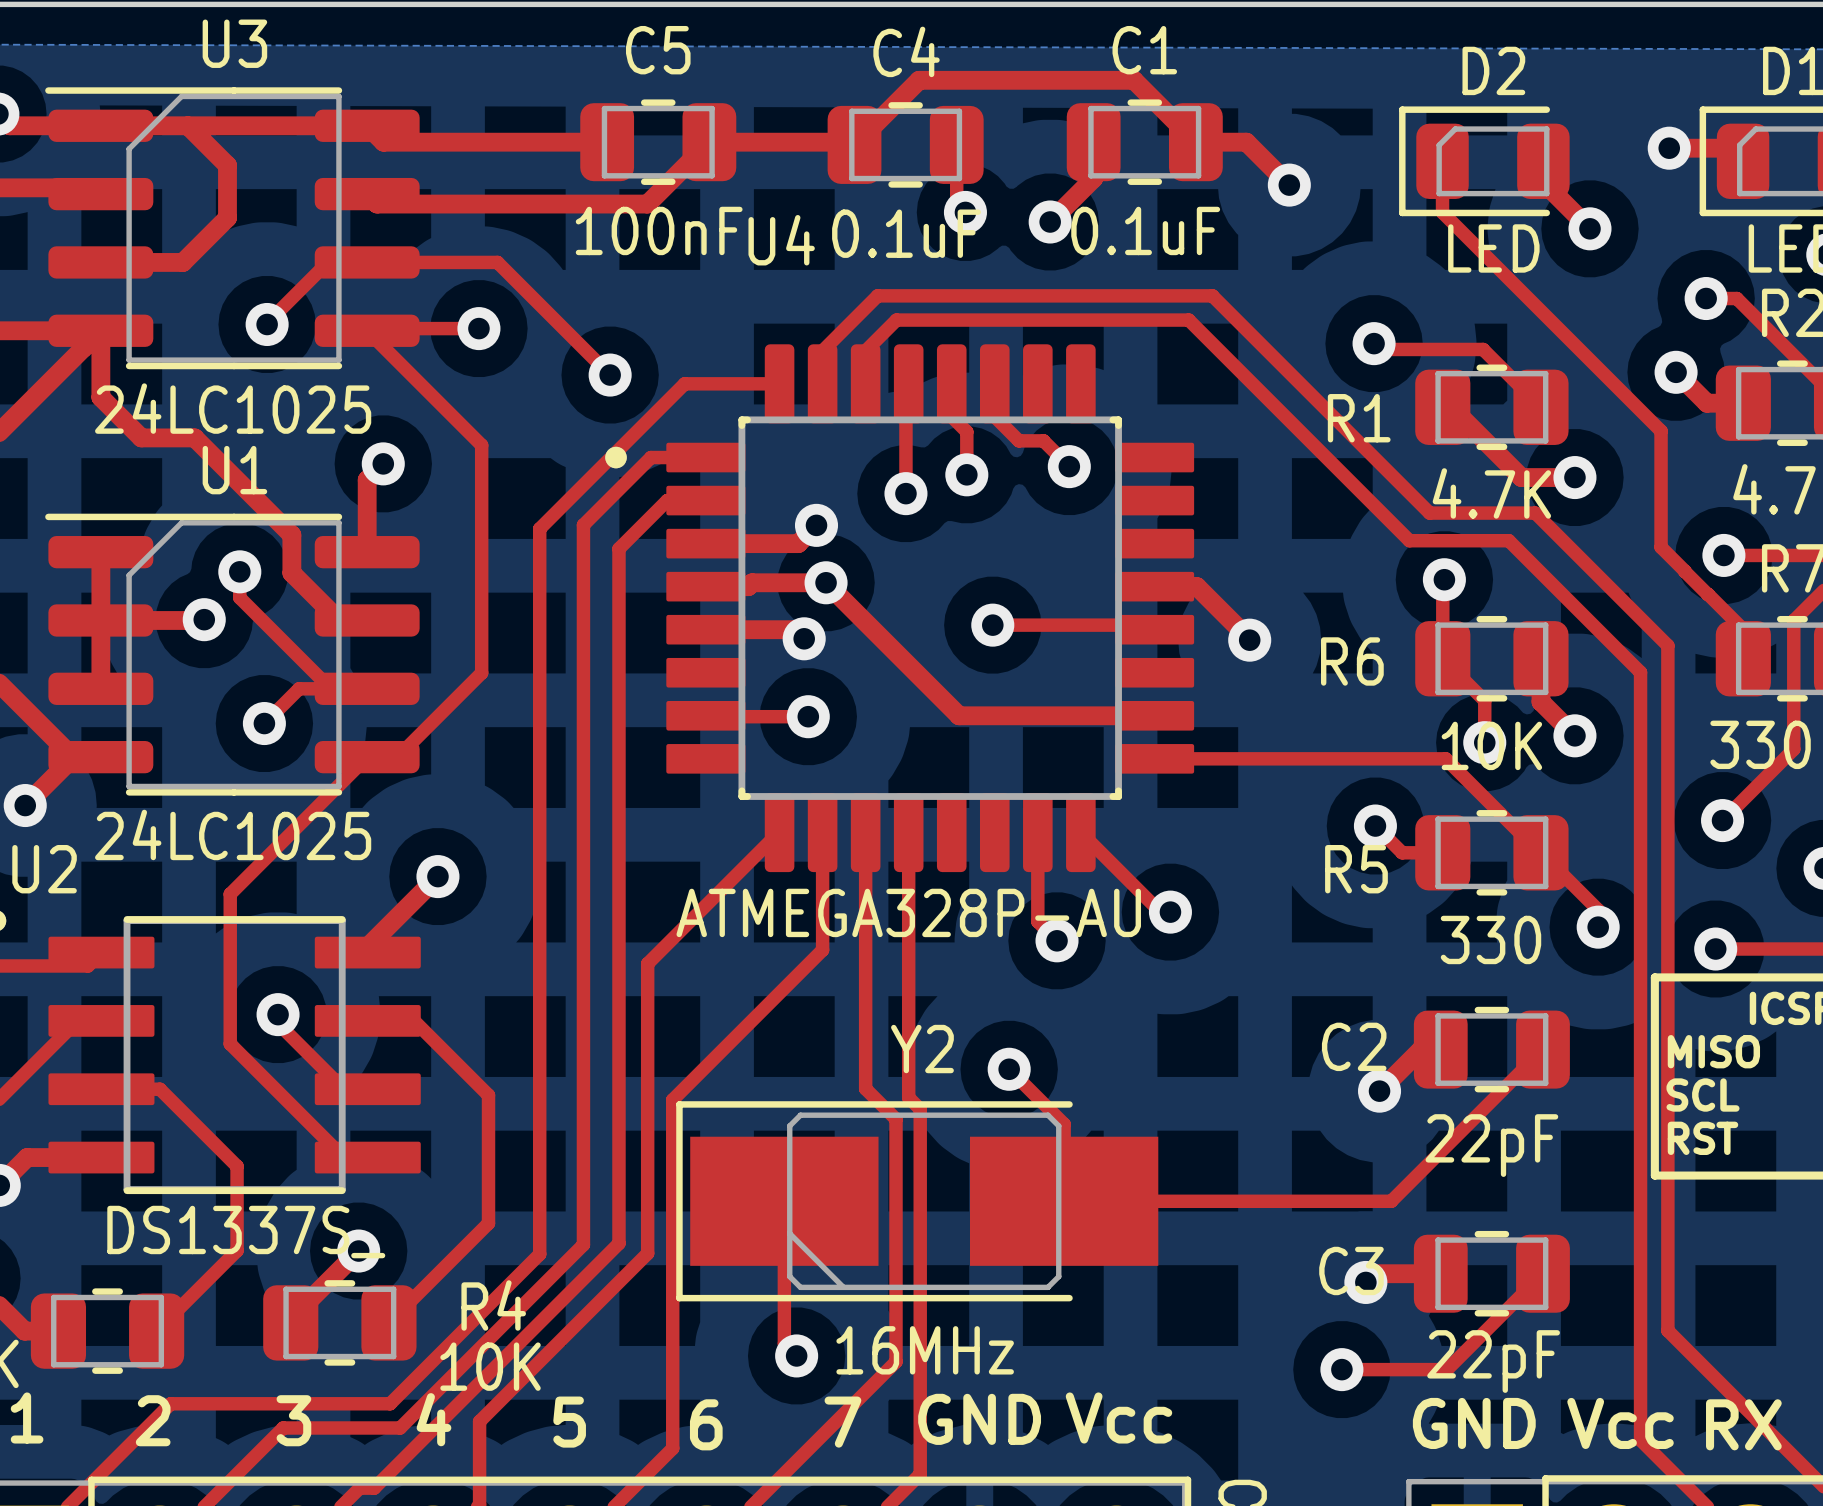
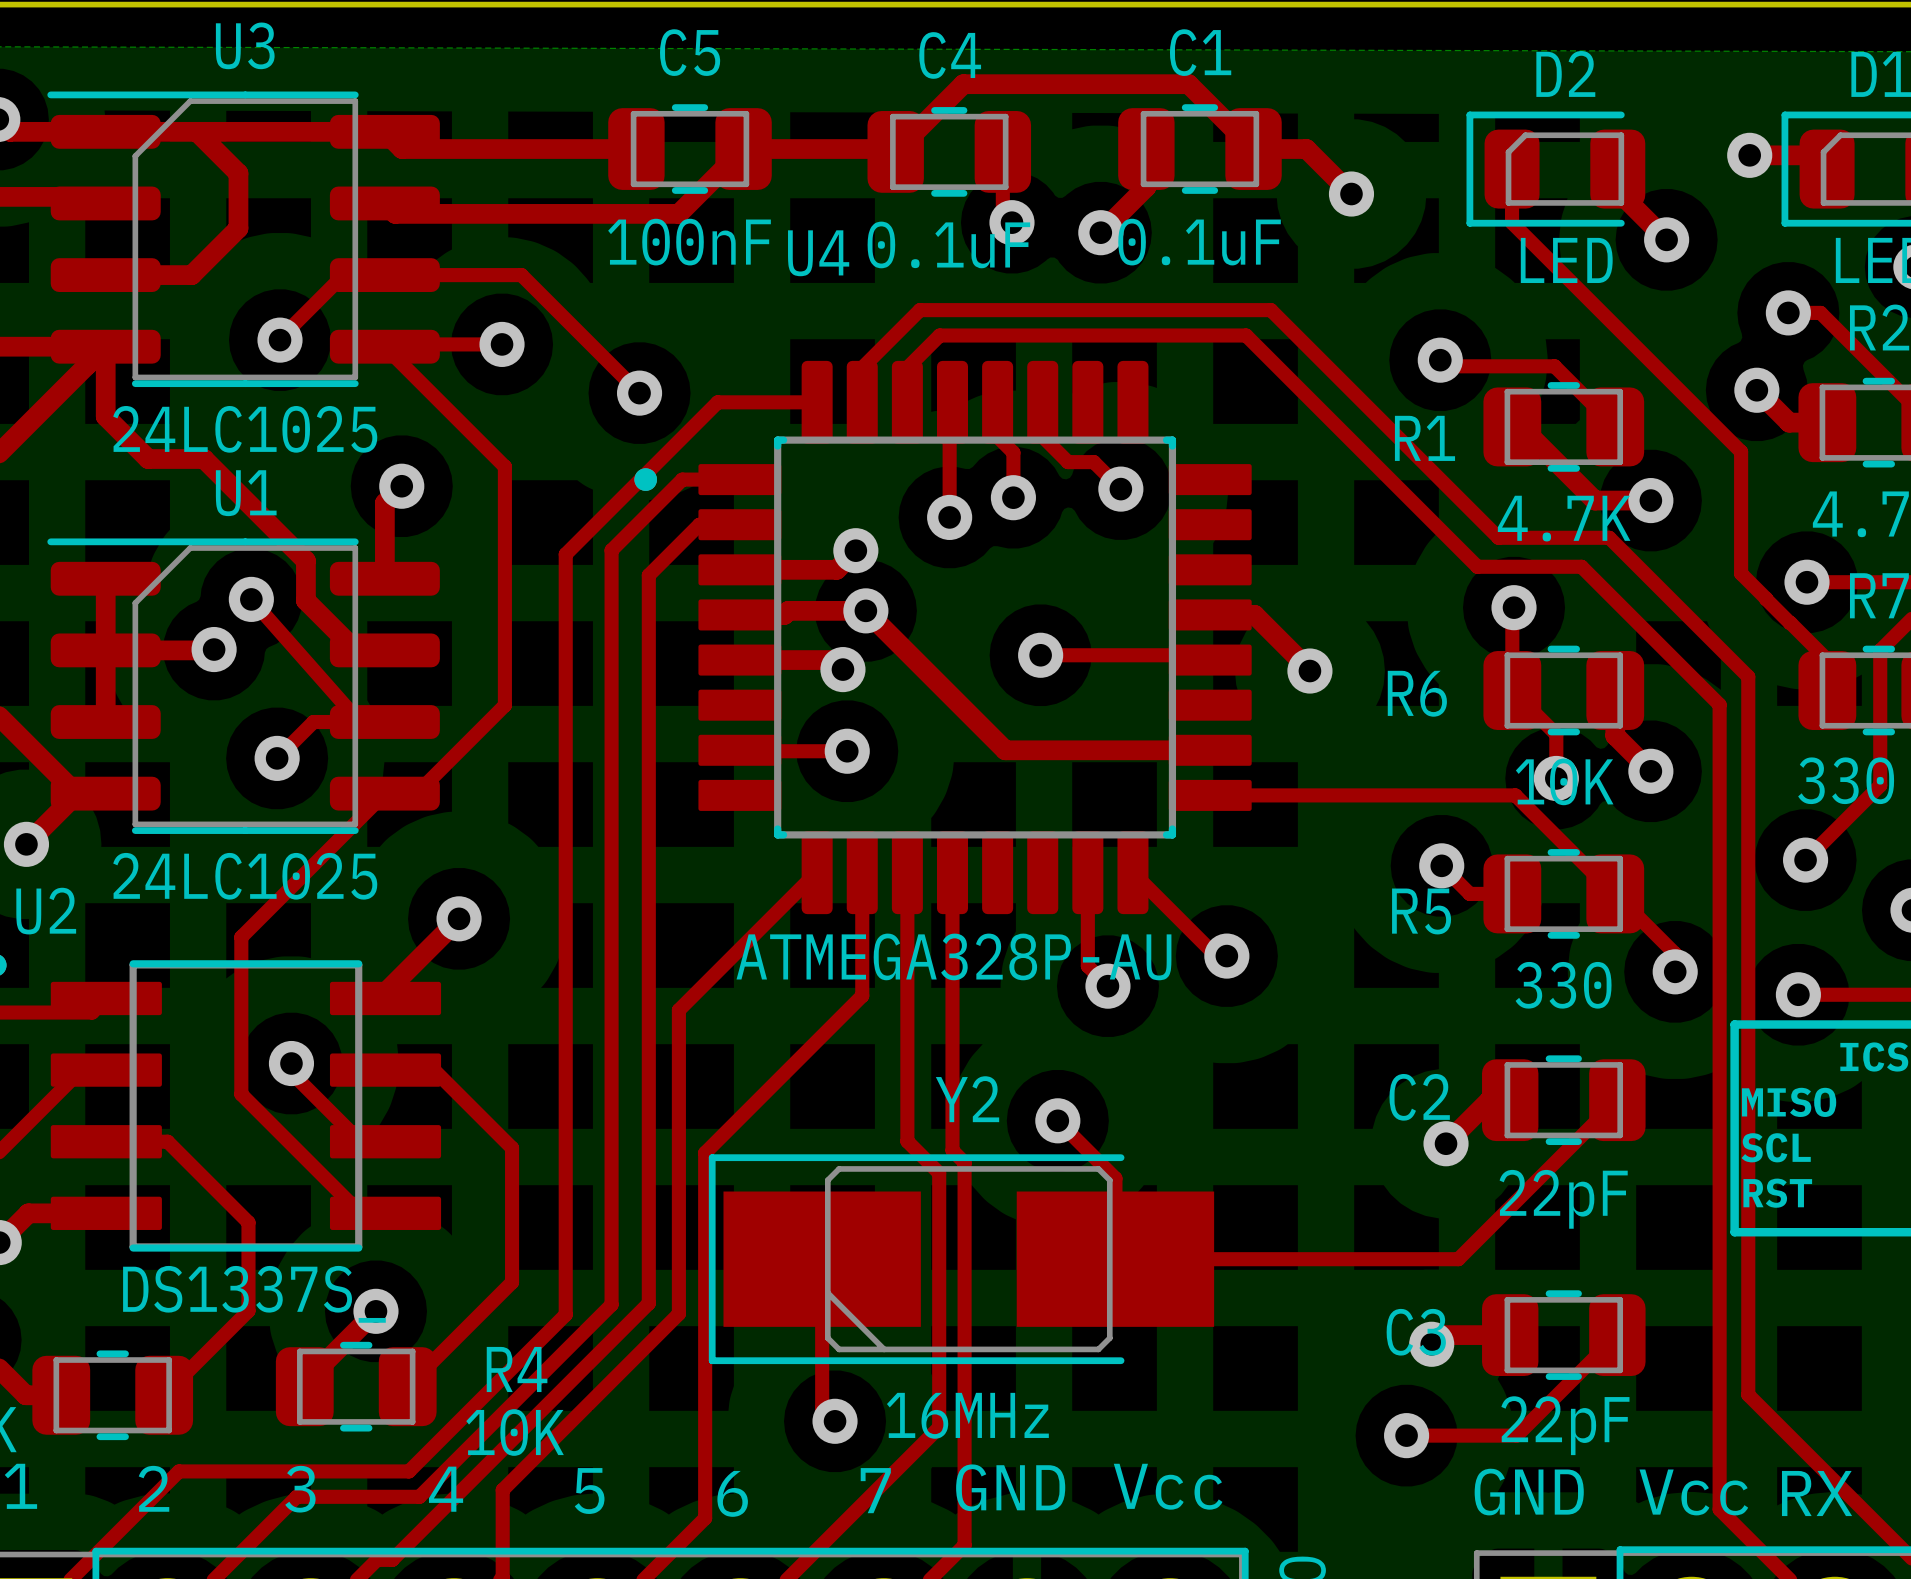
top track: (239, 571) (239, 597) (330, 688) -> (251, 599) (359, 722)

